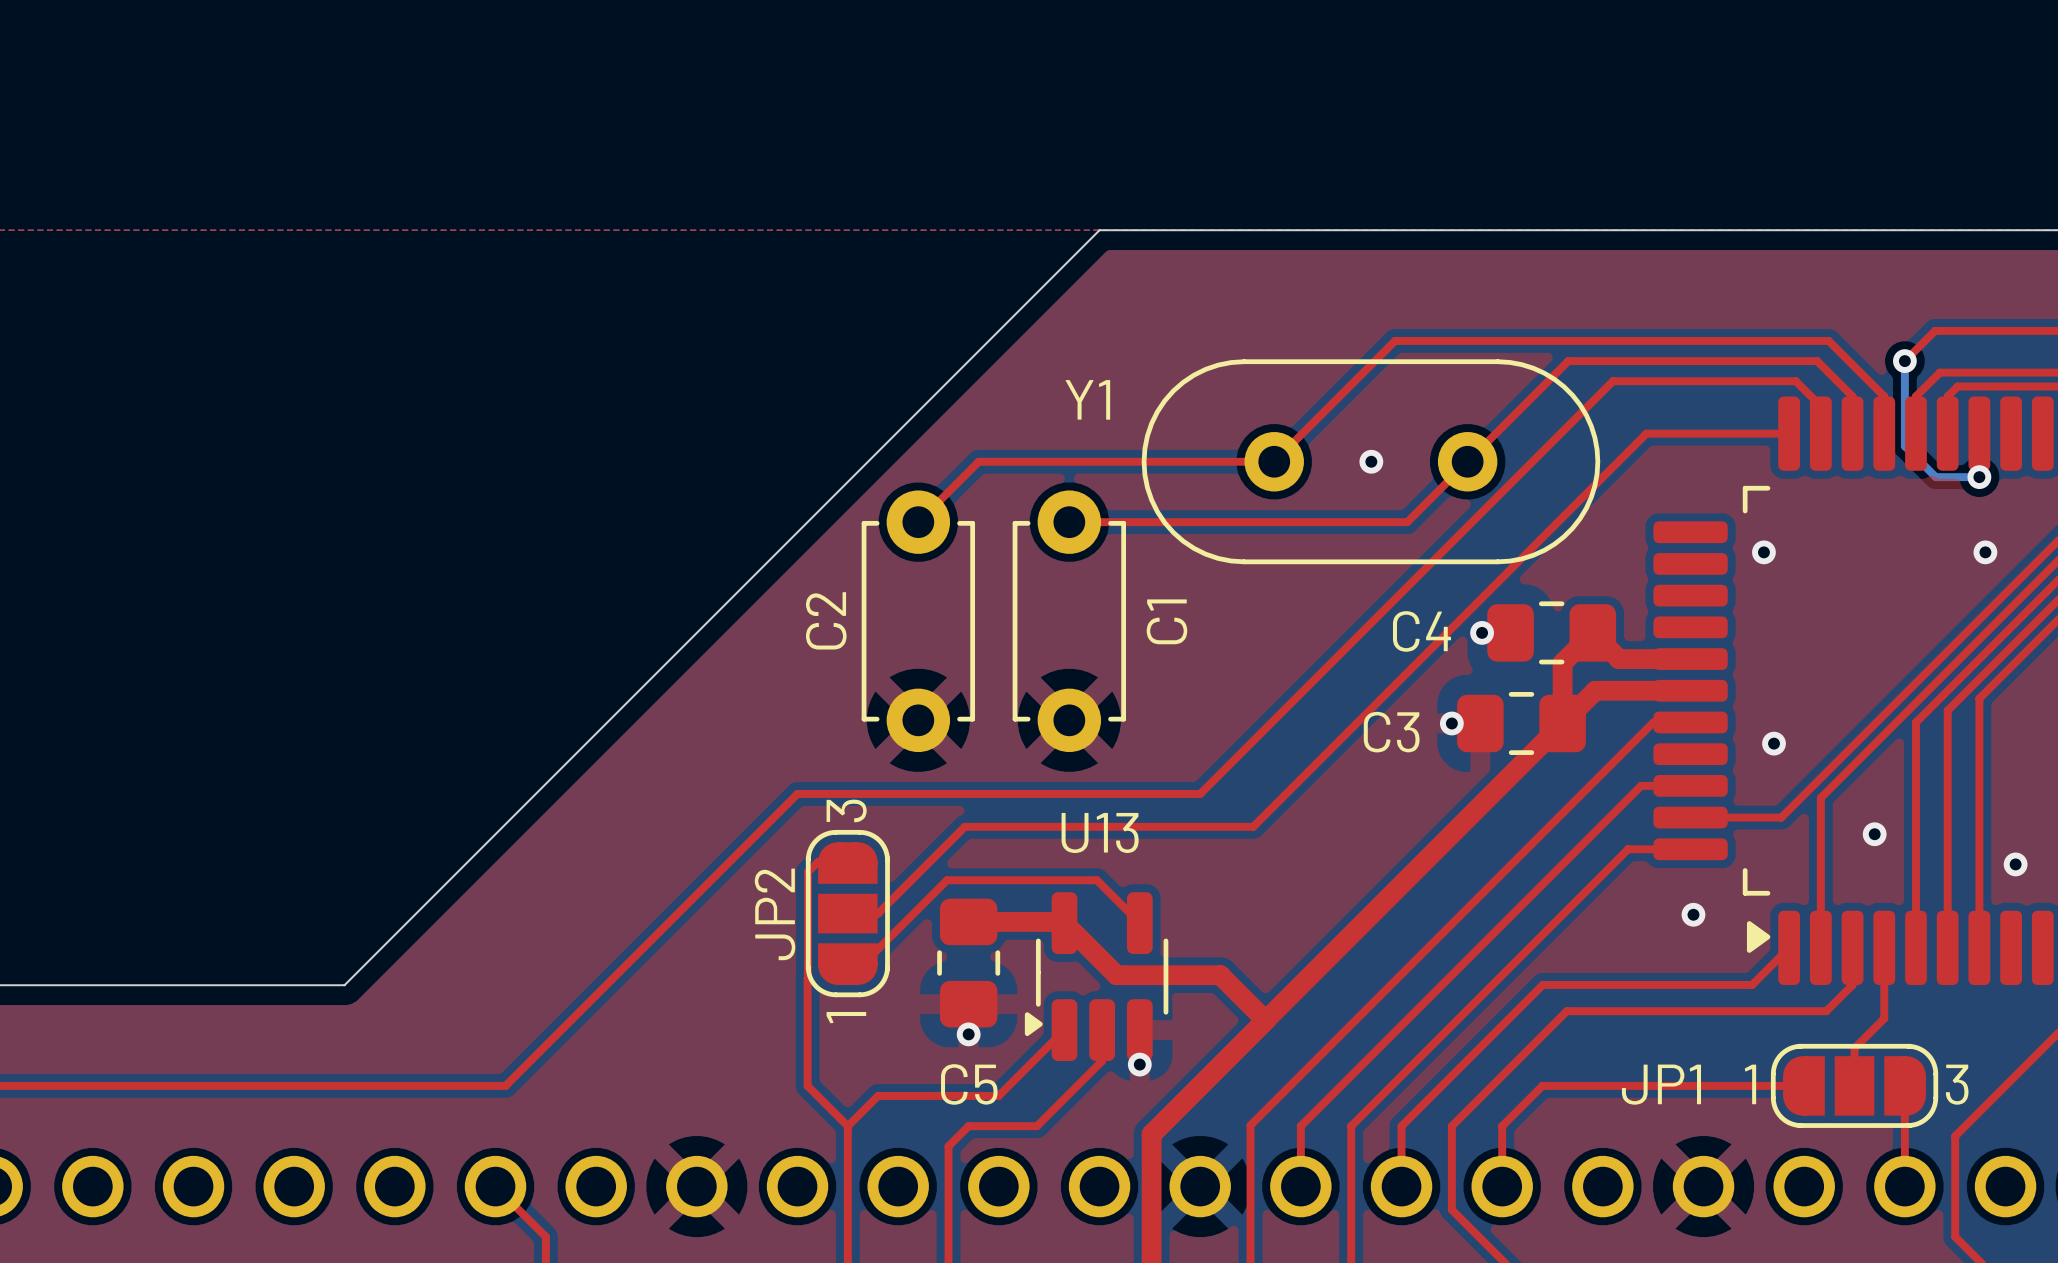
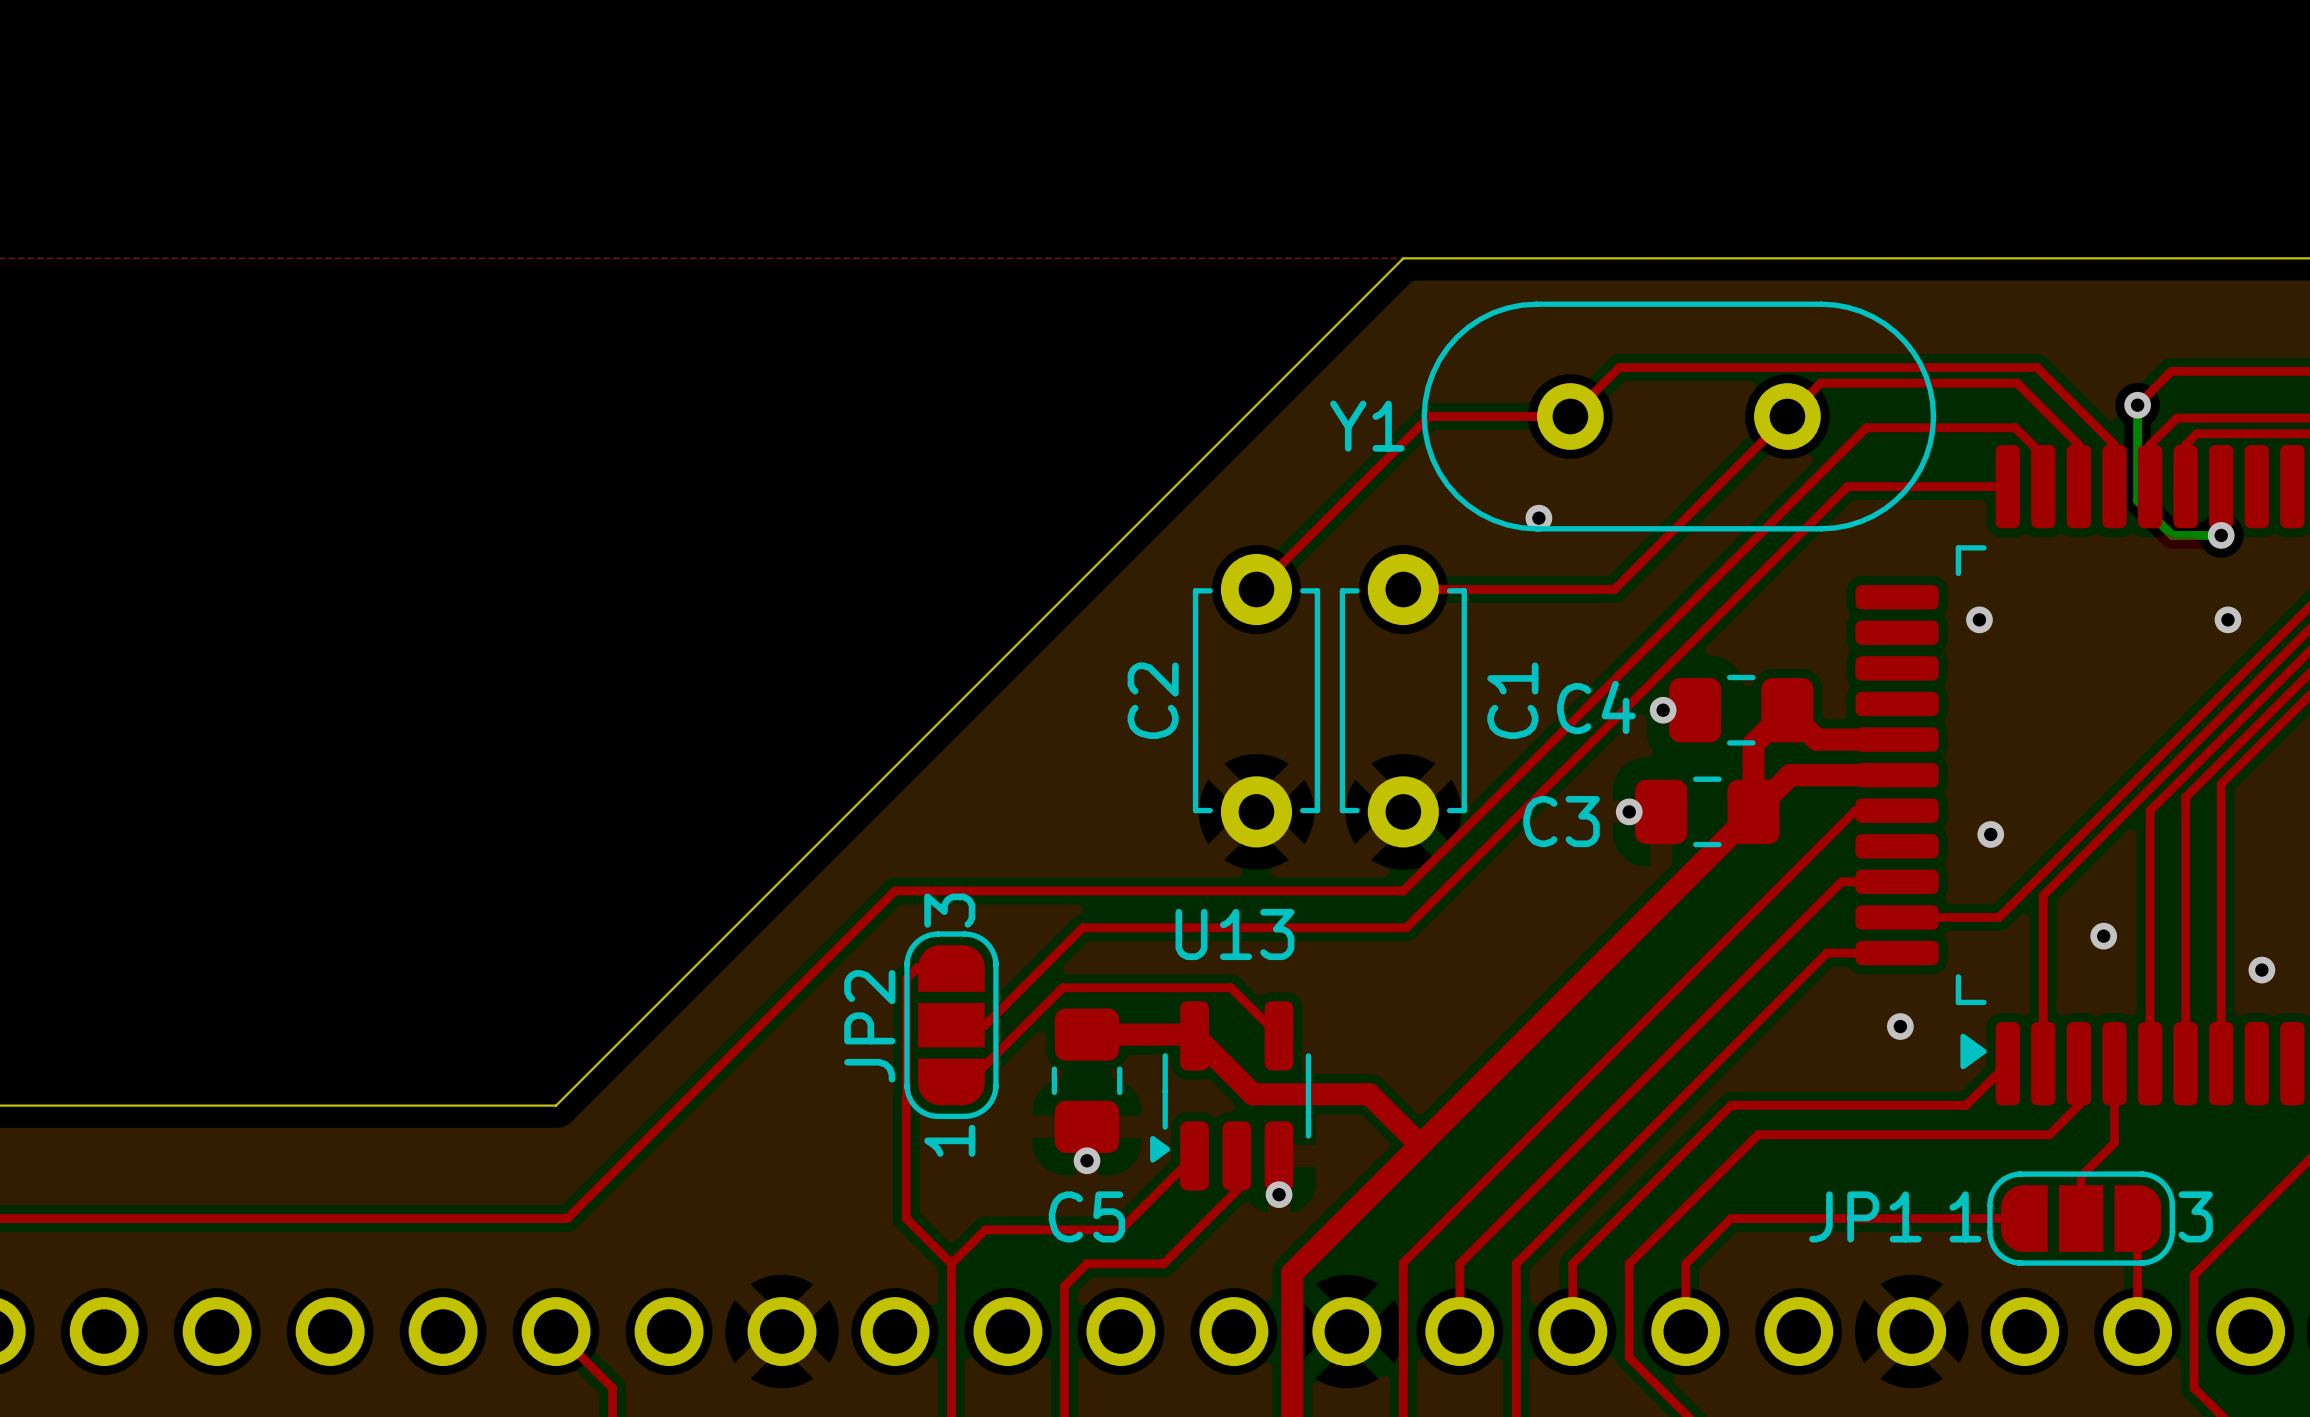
board edge: (1250, 230) (1099, 230) (344, 985) -> (1403, 258) (556, 1105) (386, 1105)
top track: (1828, 340) (1395, 340) (1274, 461) (978, 461) (918, 522) -> (2052, 382) (2037, 367) (1619, 367) (1570, 416) (1429, 416) (1256, 589)
top track: (1817, 361) (1568, 361) (1407, 522) (1069, 522) -> (2039, 405) (2017, 383) (1820, 383) (1614, 589) (1403, 589)
top track: (1663, 381) (1612, 381) (1200, 793) -> (1866, 427) (1403, 890) (1346, 890)
Y1 name position: Y1 (1087, 399) -> Y1 (1367, 426)
Y1 position: (1370, 461) -> (1678, 416)
C2 position: (918, 621) -> (1256, 700)
C1 position: (1069, 621) -> (1403, 700)

